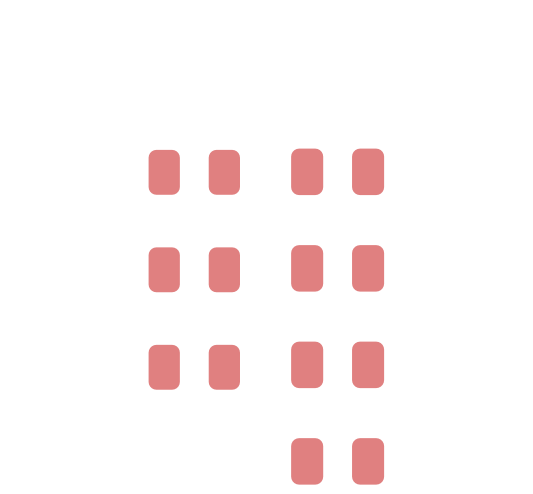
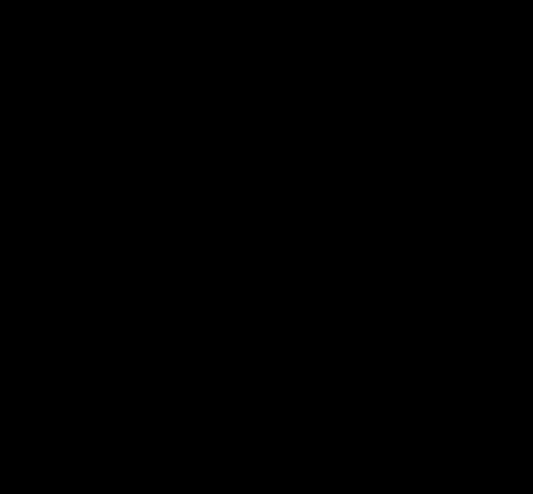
part: (337, 171) -> none
part: (194, 172) -> none
part: (337, 268) -> none
part: (194, 269) -> none
part: (337, 364) -> none
part: (194, 367) -> none
part: (337, 461) -> none

